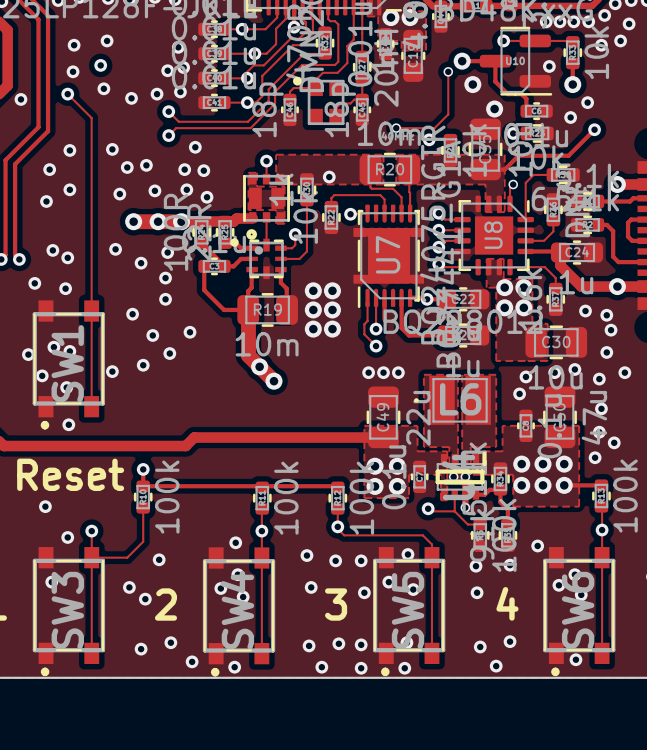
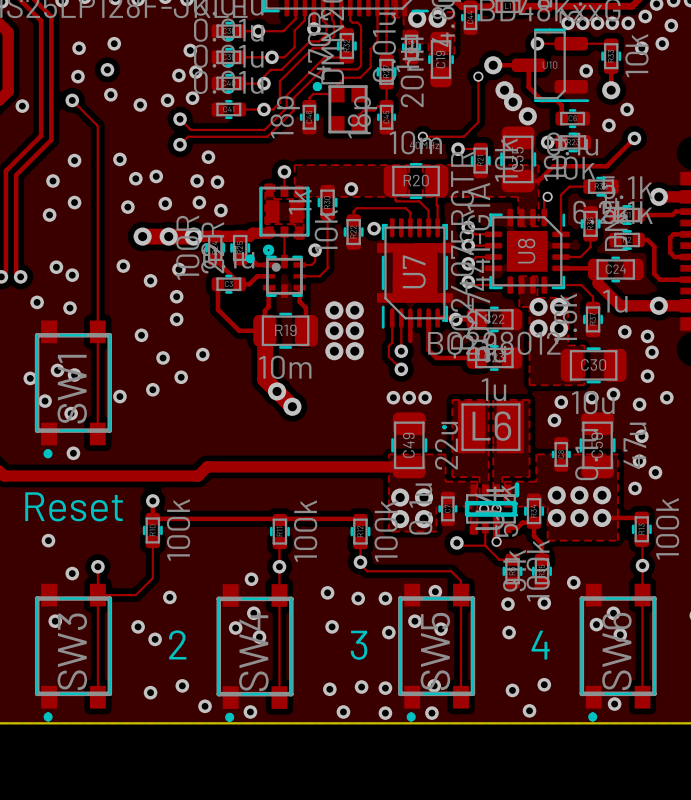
via: none -> (568, 23)
via: none -> (513, 102)

